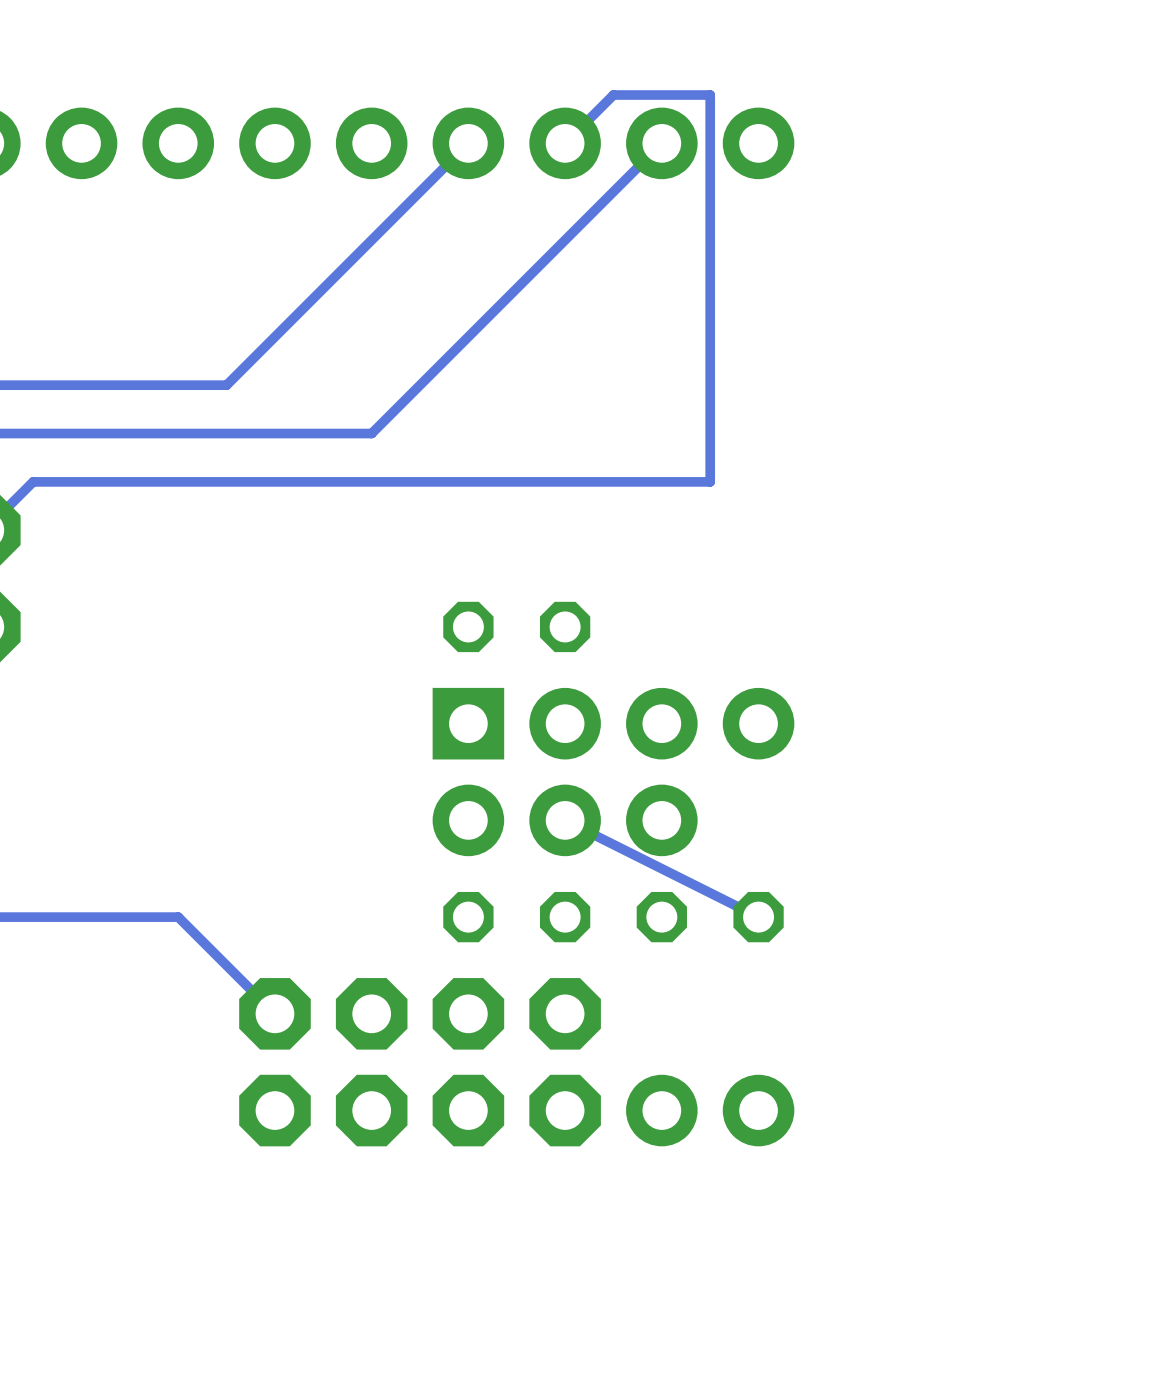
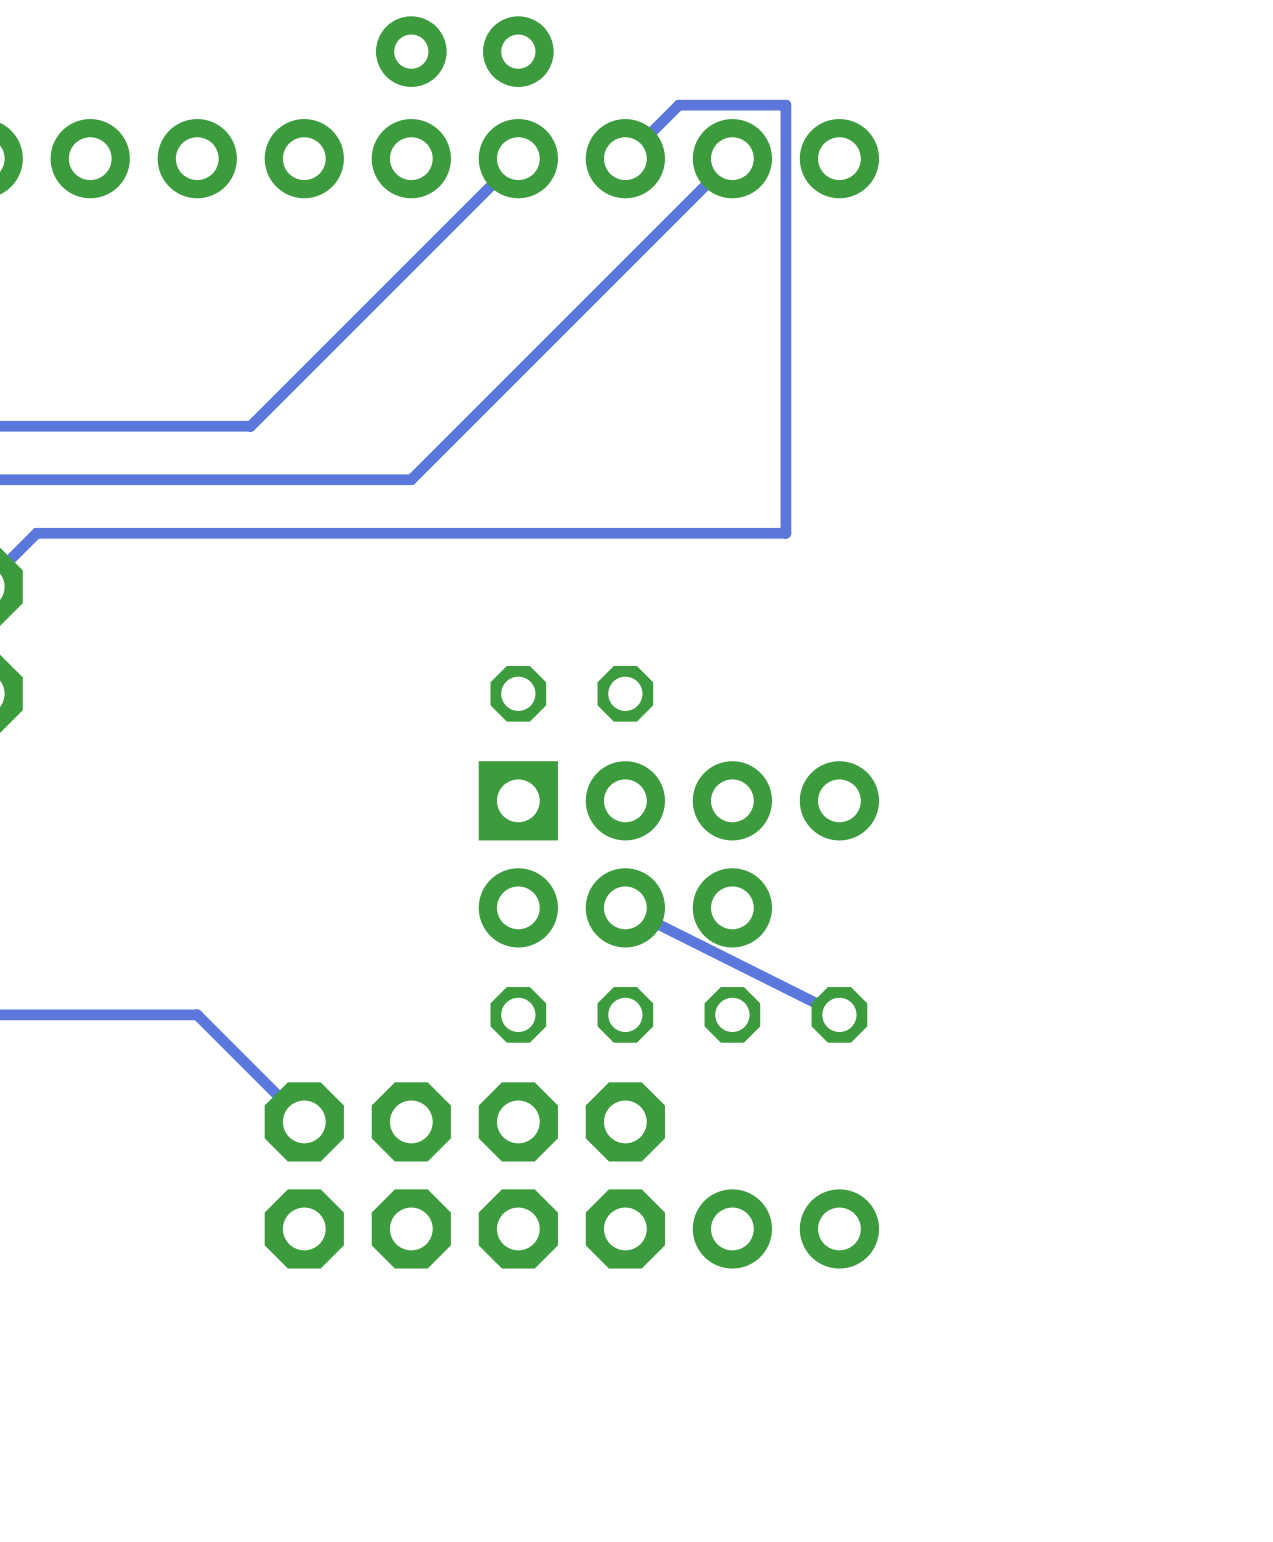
part: none -> (464, 51)

